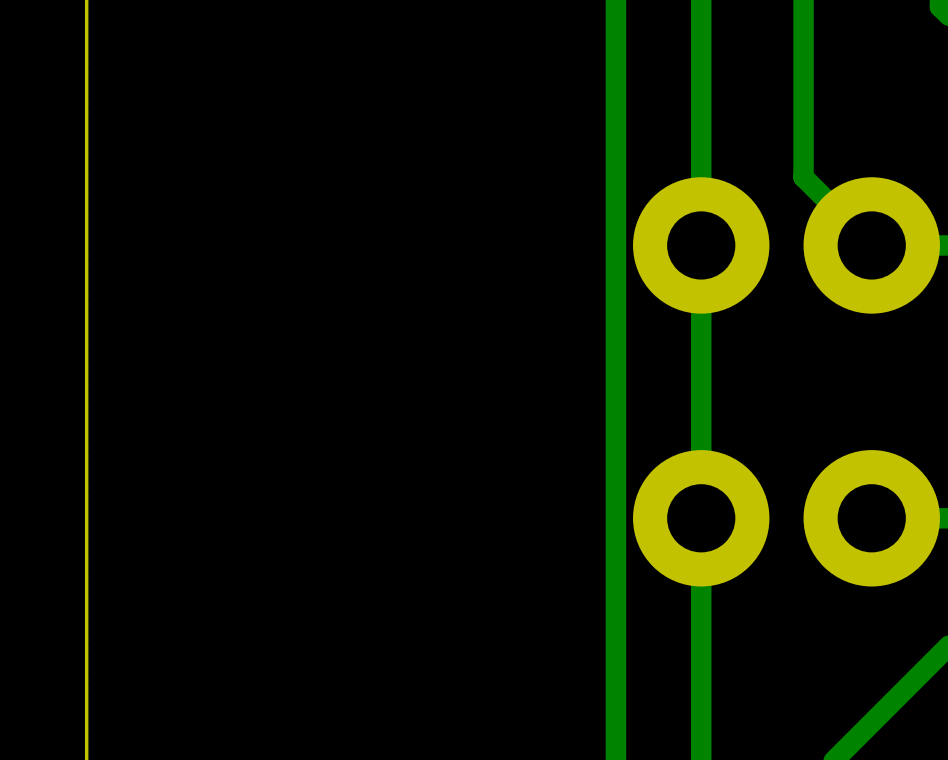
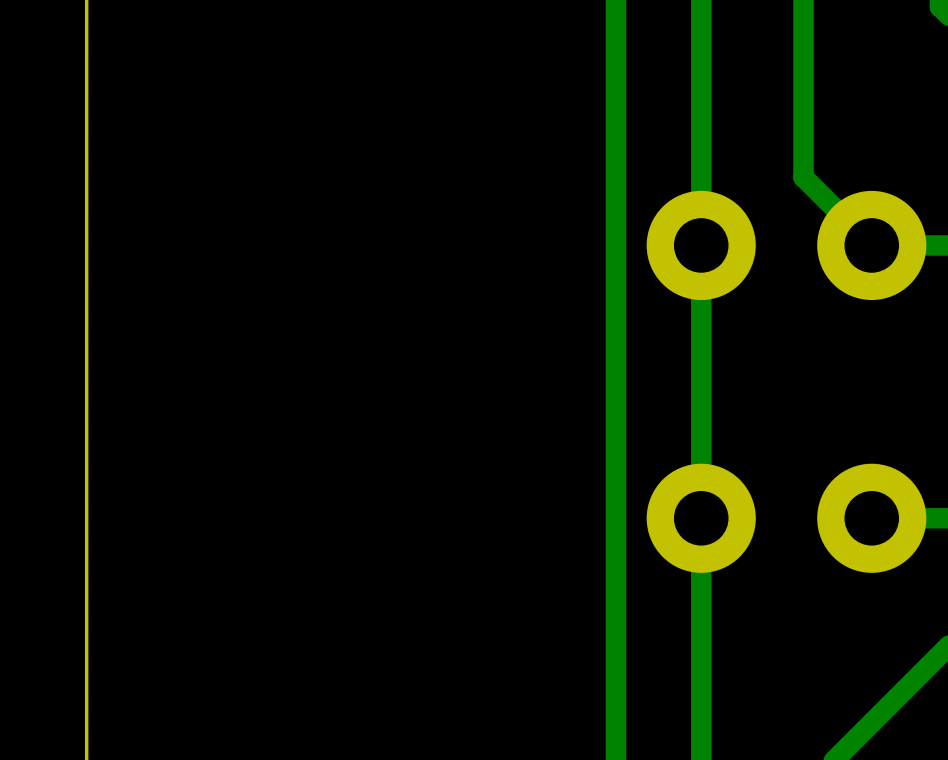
part footprint: [633, 177, 940, 314] -> [646, 190, 927, 301]
part footprint: [633, 450, 940, 587] -> [646, 463, 927, 573]

